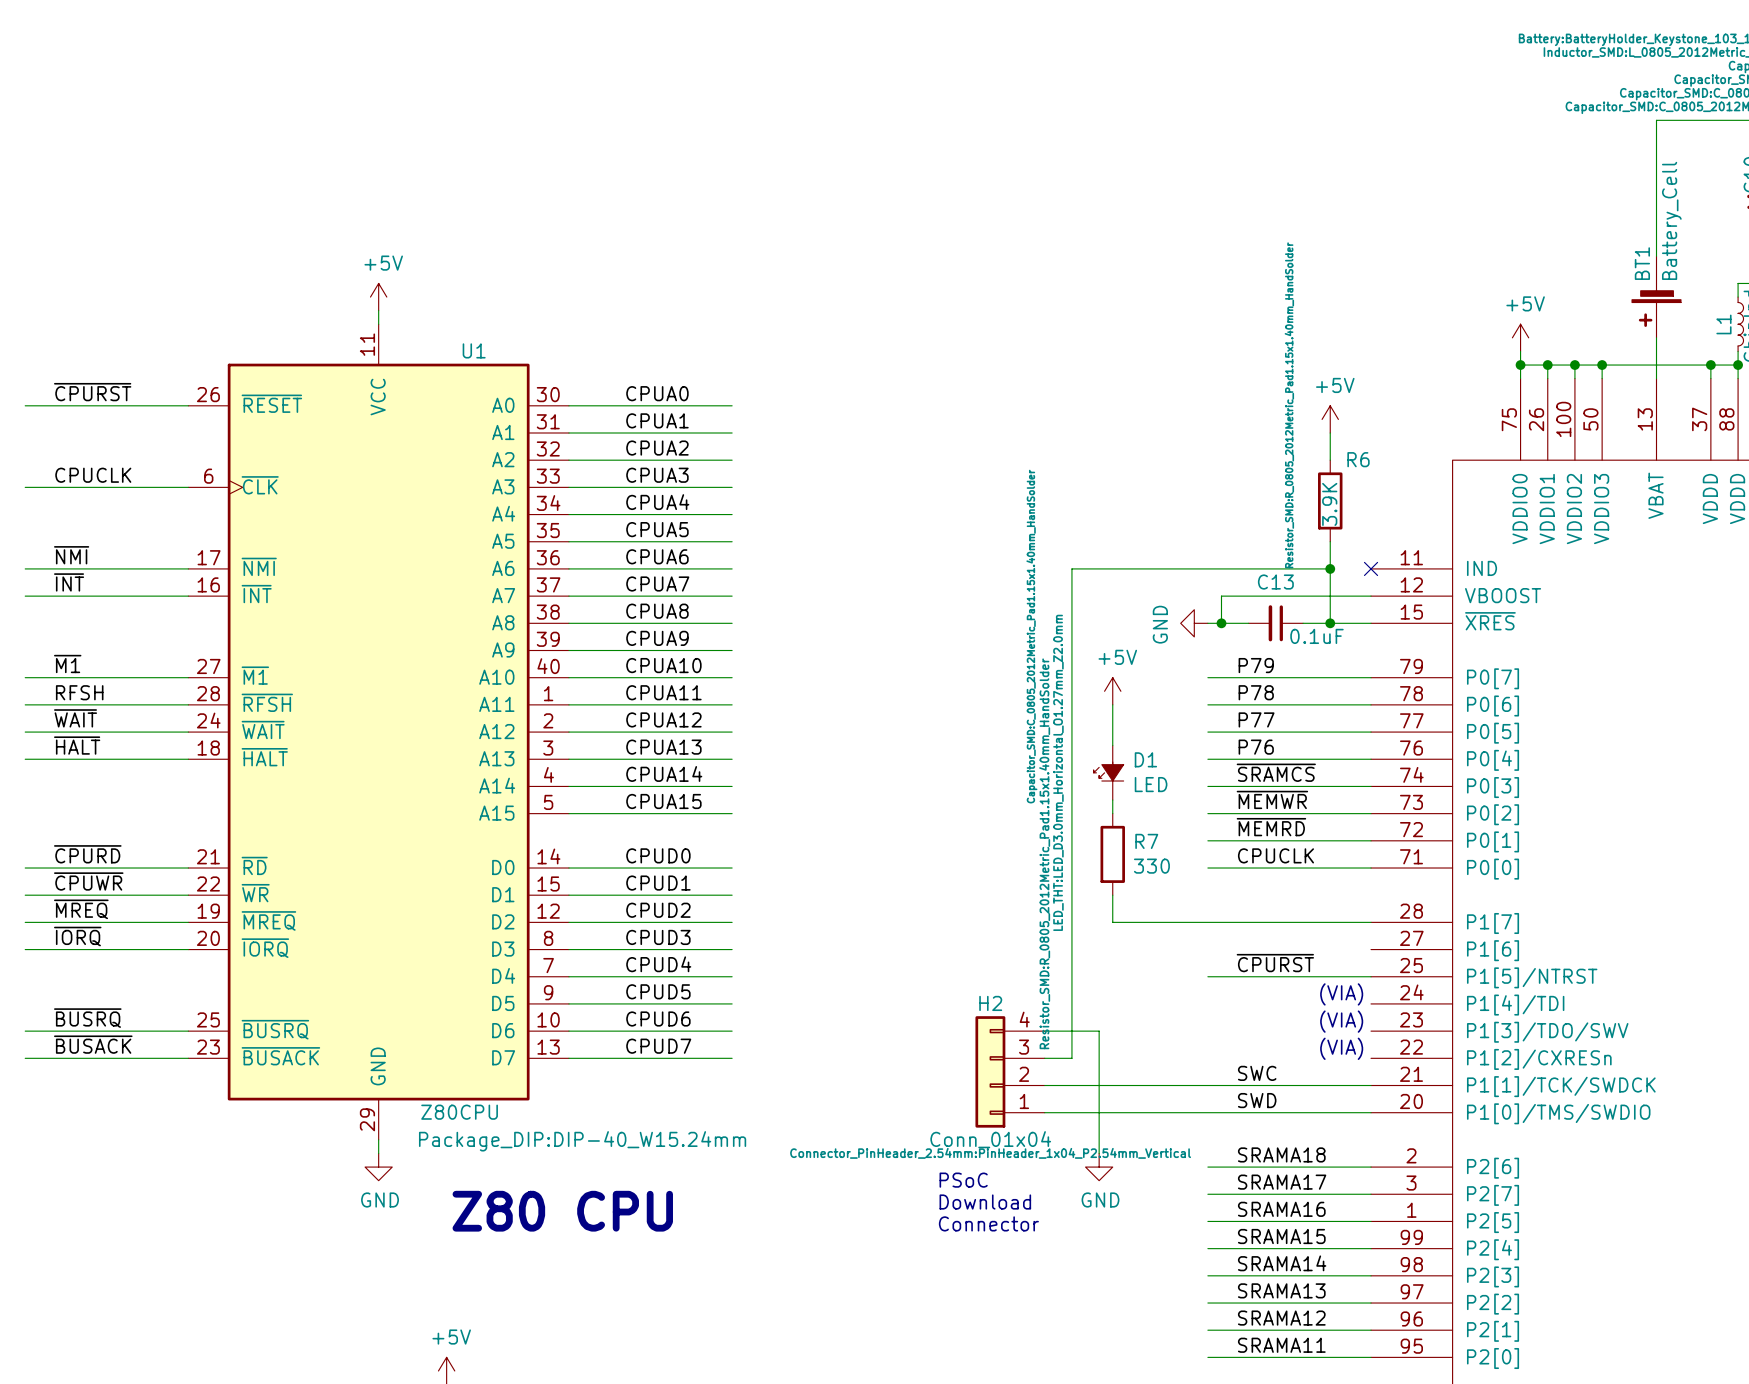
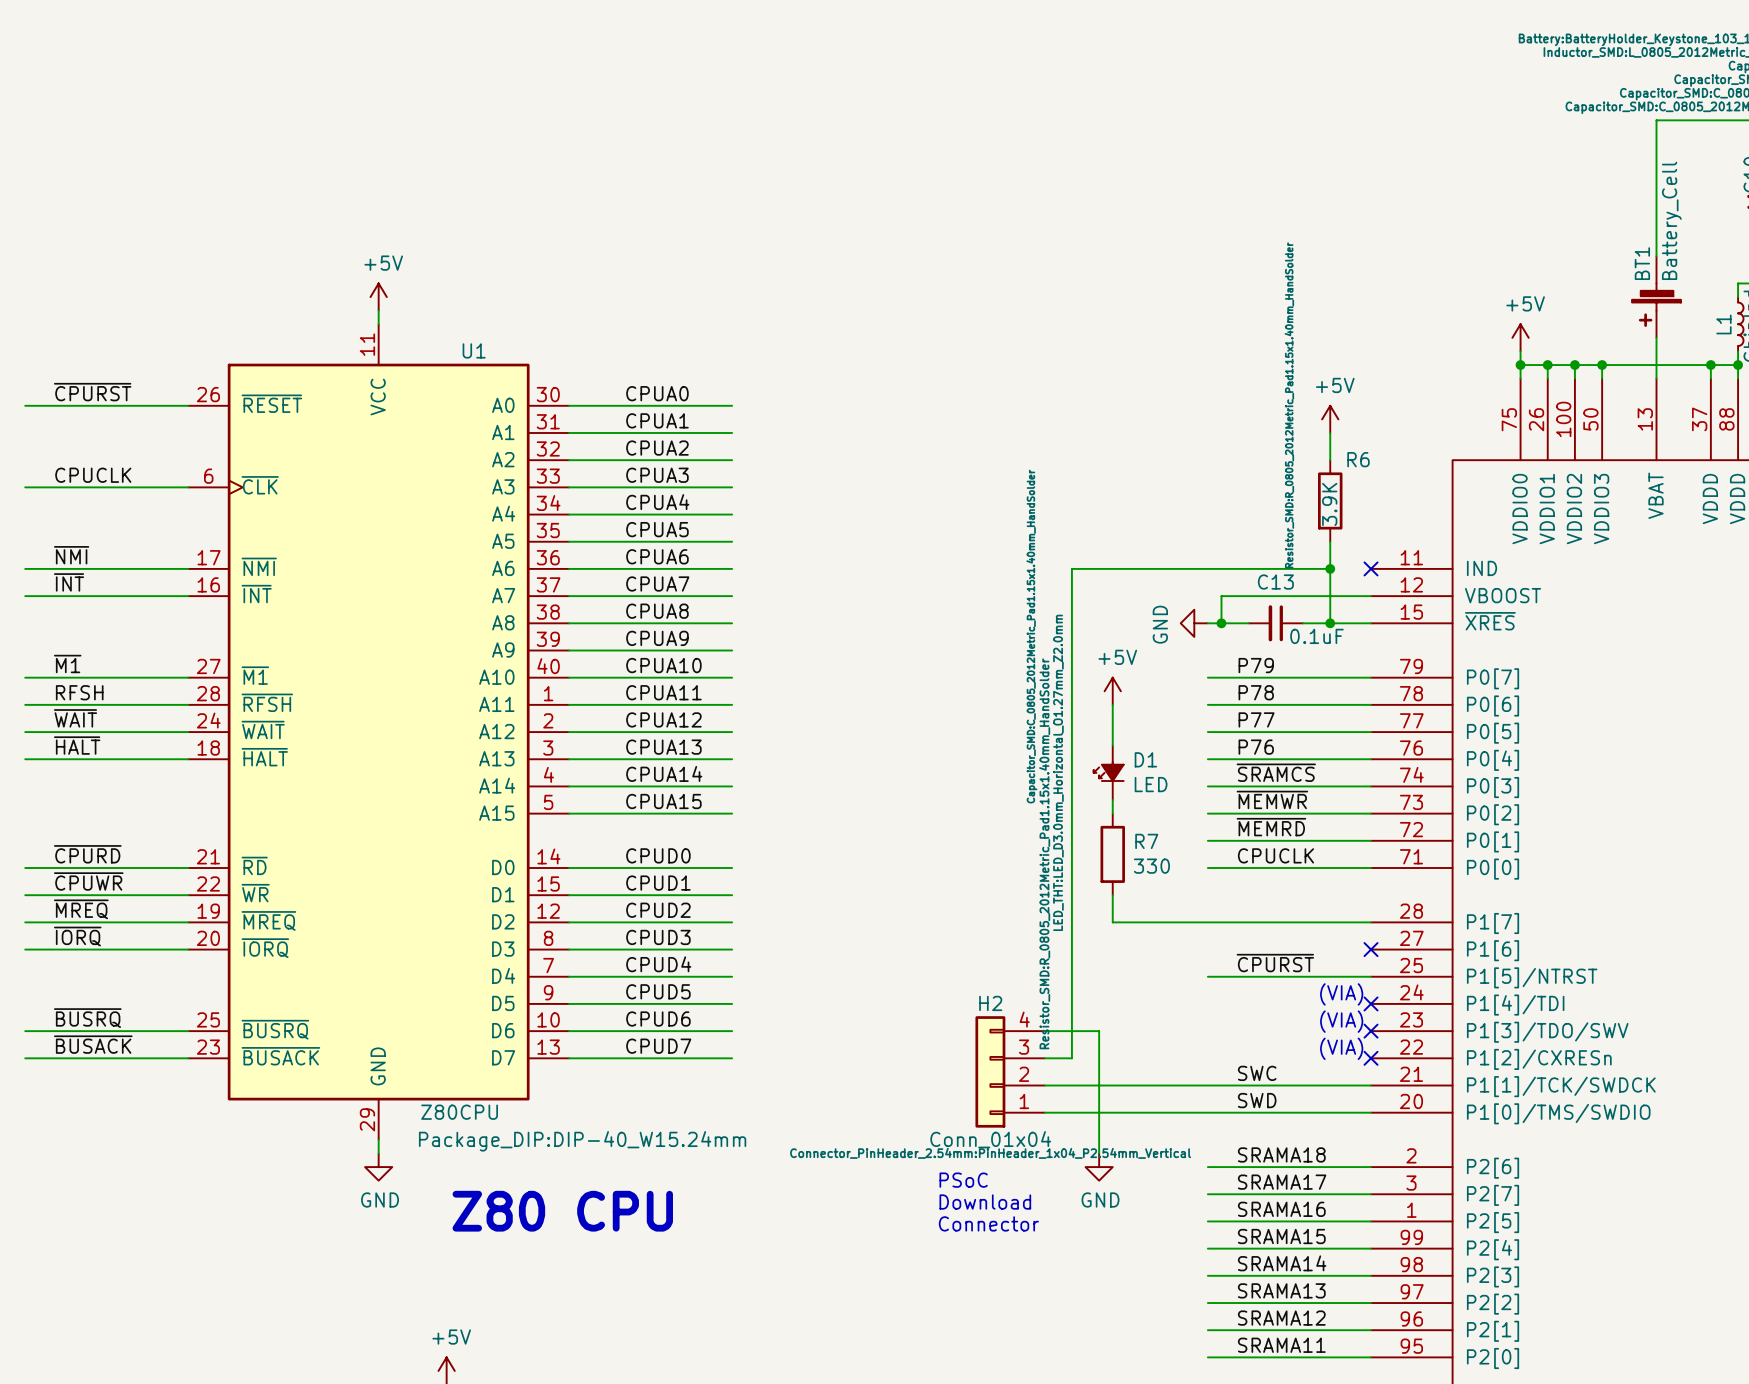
no-connect mark: none -> (1371, 949)
no-connect mark: none -> (1371, 1003)
no-connect mark: none -> (1371, 1031)
no-connect mark: none -> (1371, 1058)

